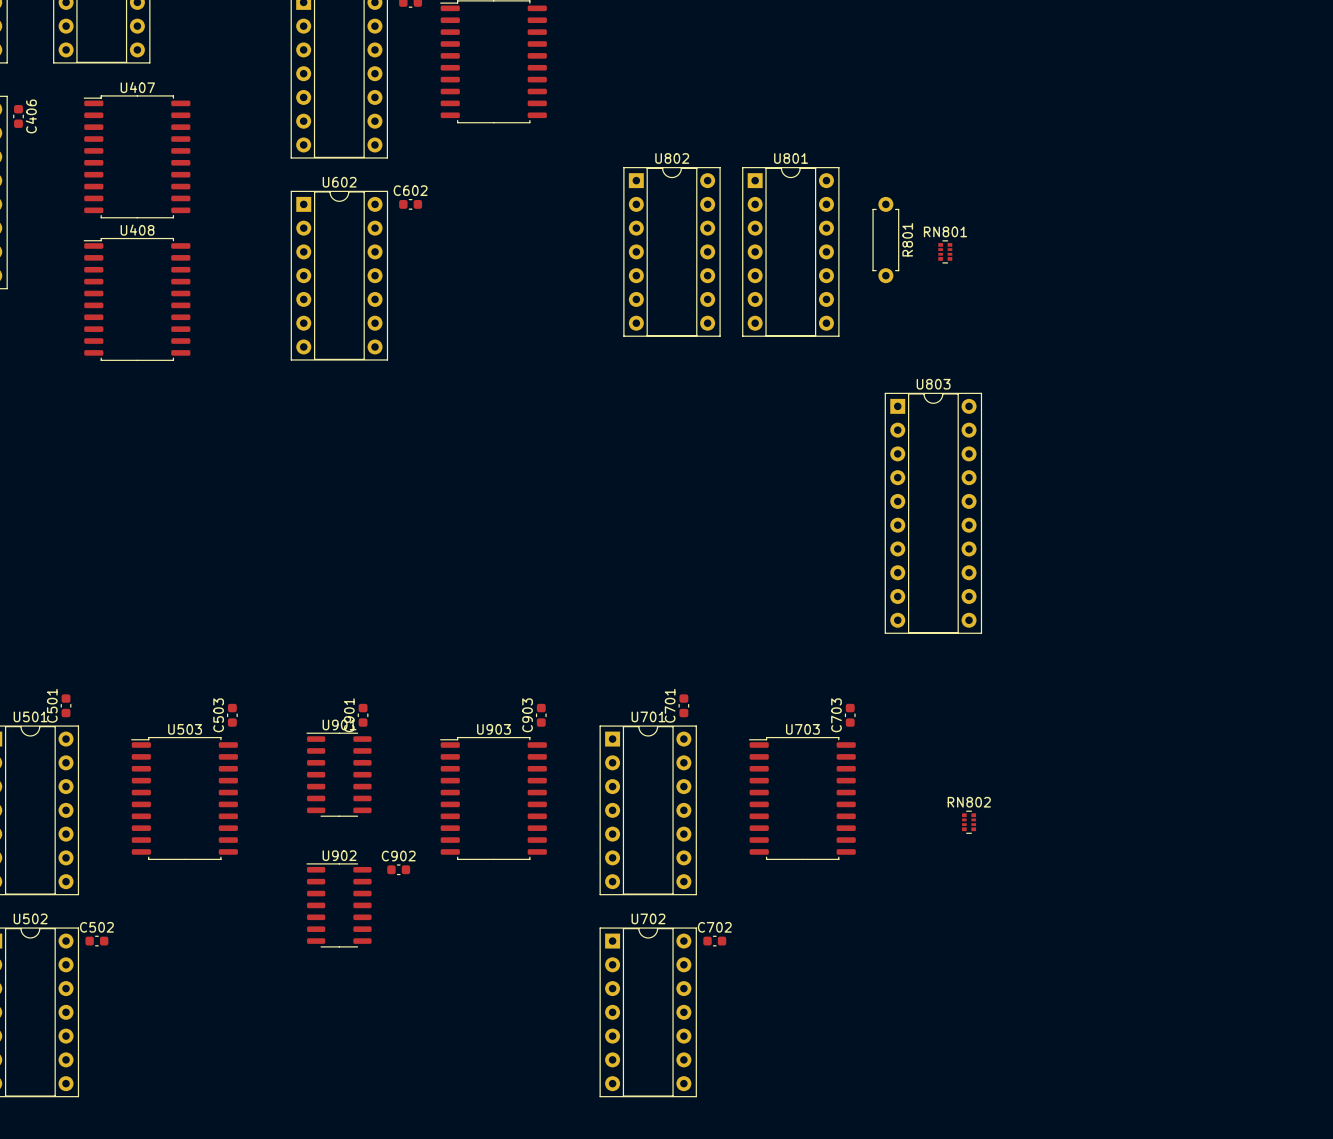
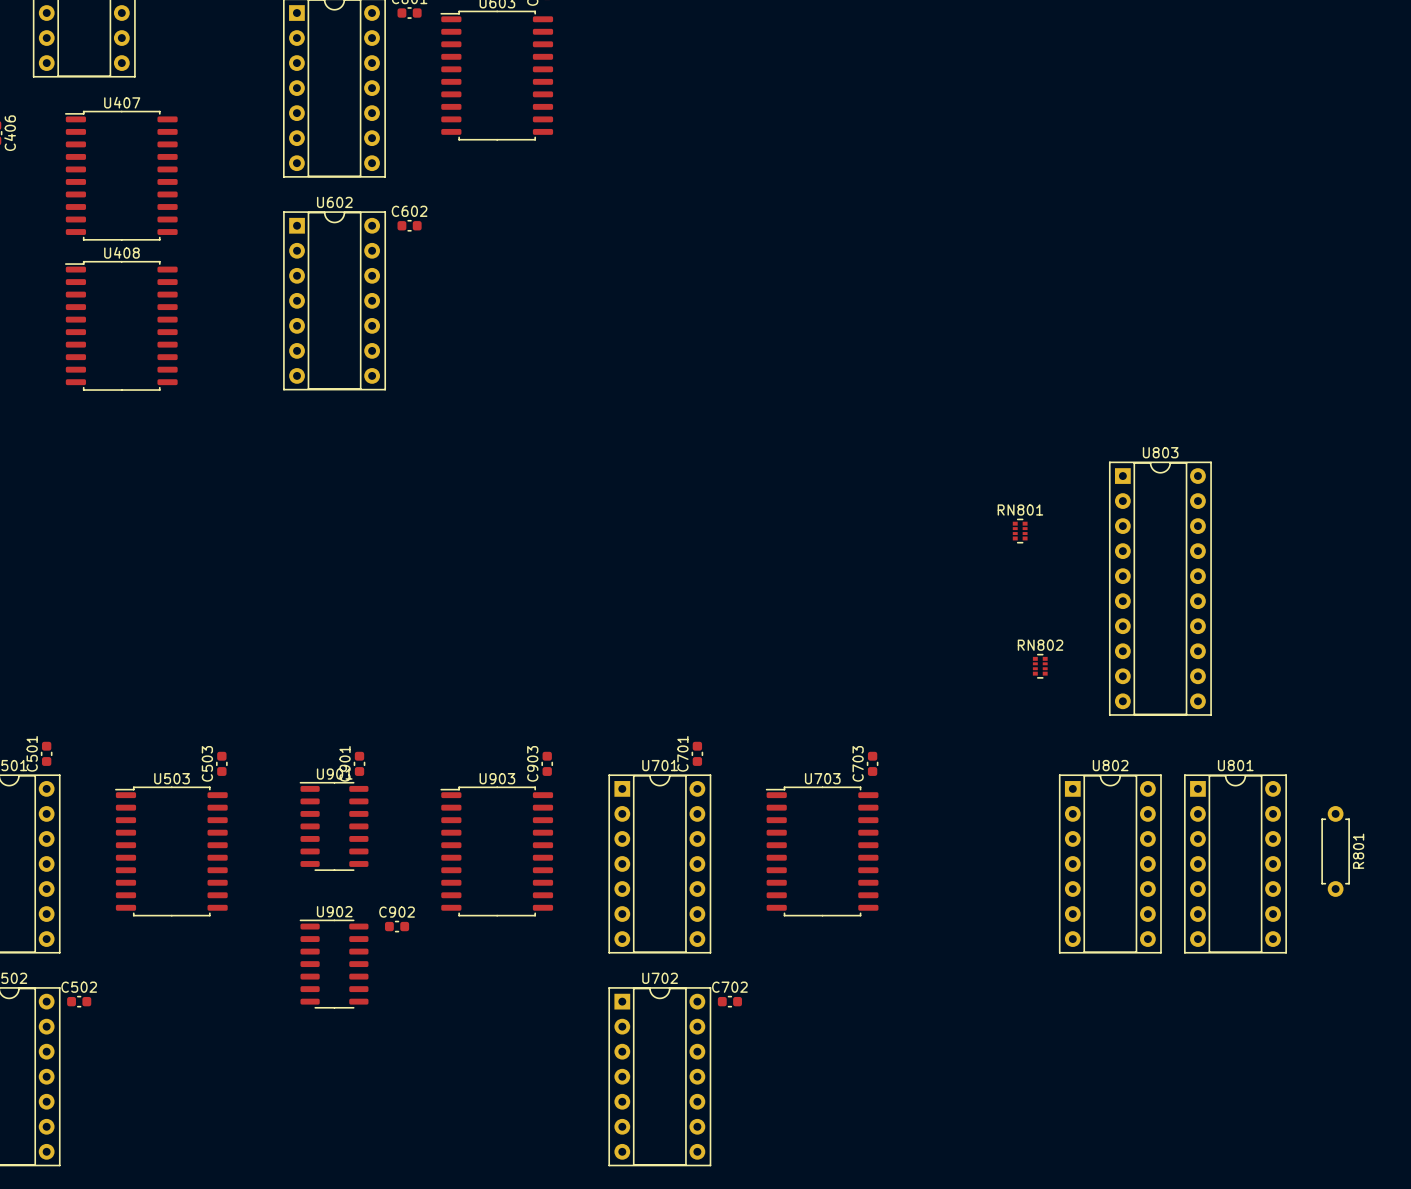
R801 position: (885, 240) -> (1335, 851)
U802 position: (671, 251) -> (1110, 863)
U801 position: (790, 251) -> (1235, 863)
RN801 position: (945, 251) -> (1020, 531)
U803 position: (933, 513) -> (1160, 588)
RN802 position: (969, 822) -> (1040, 666)

